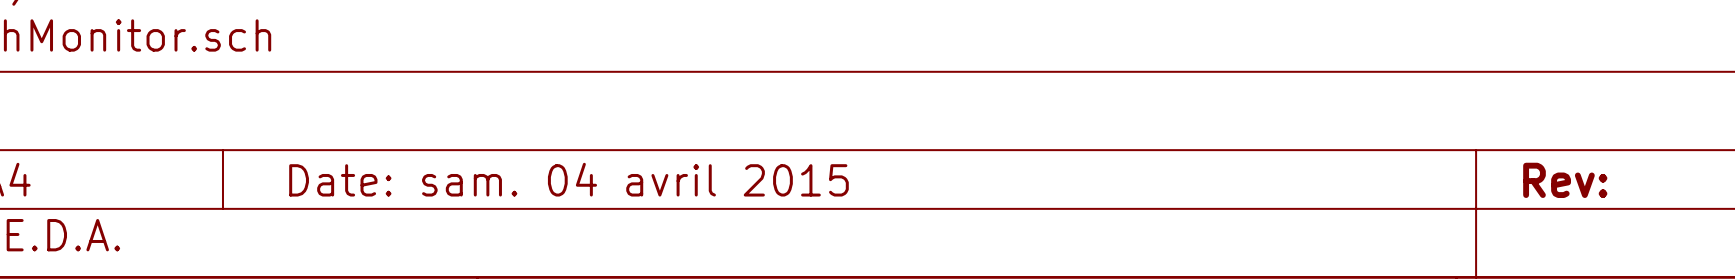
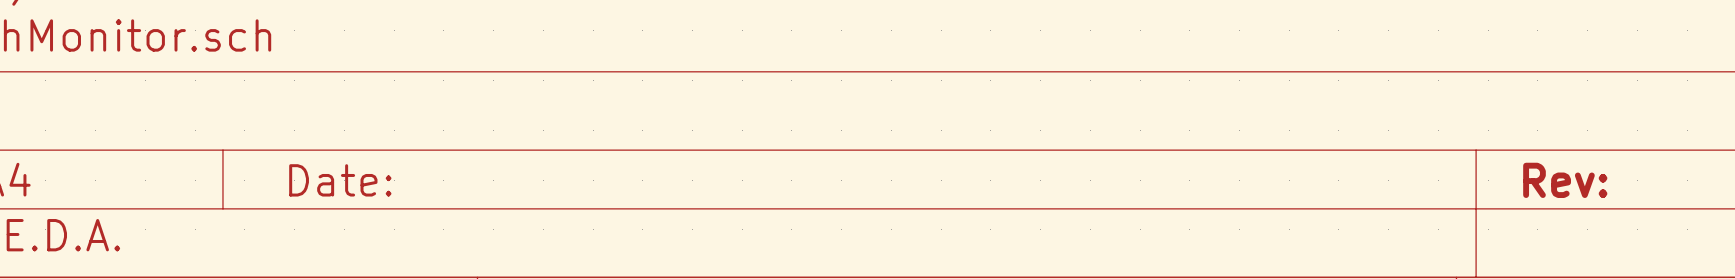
title block: Date: sam. 04 avril 2015 (568, 179) -> Date: (340, 180)

